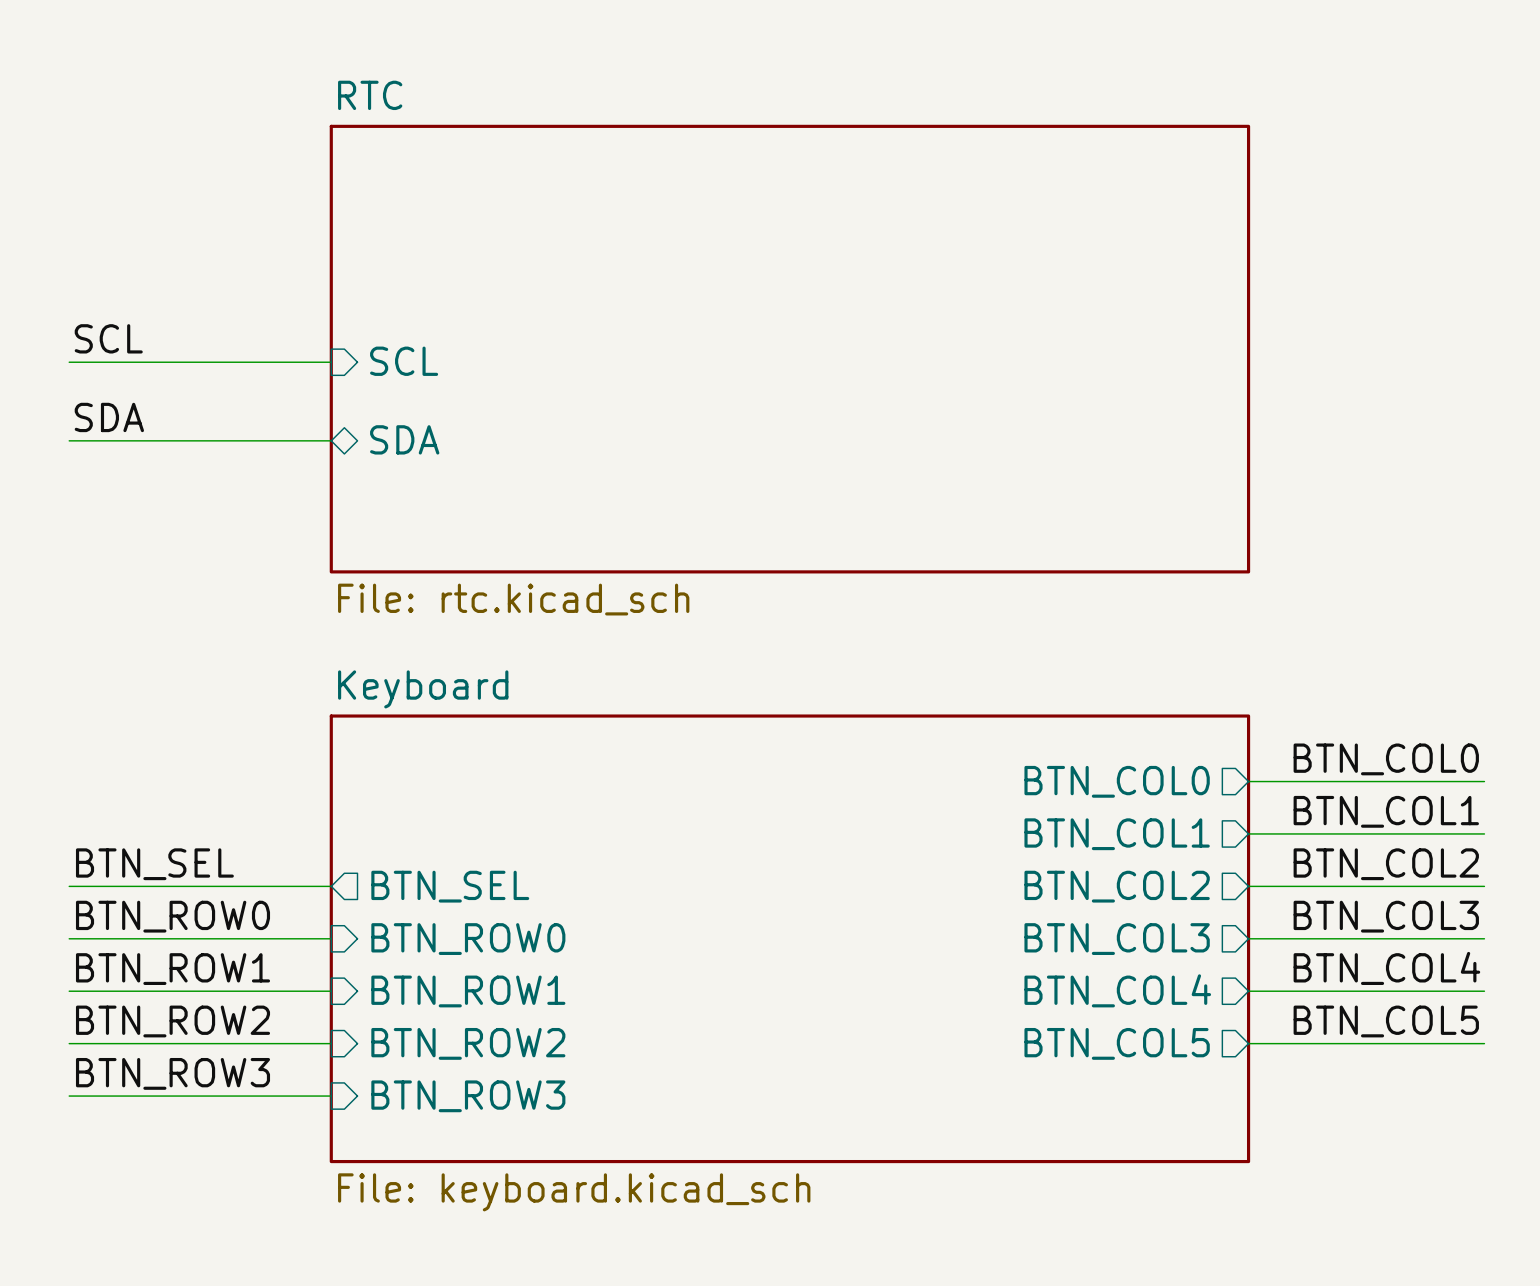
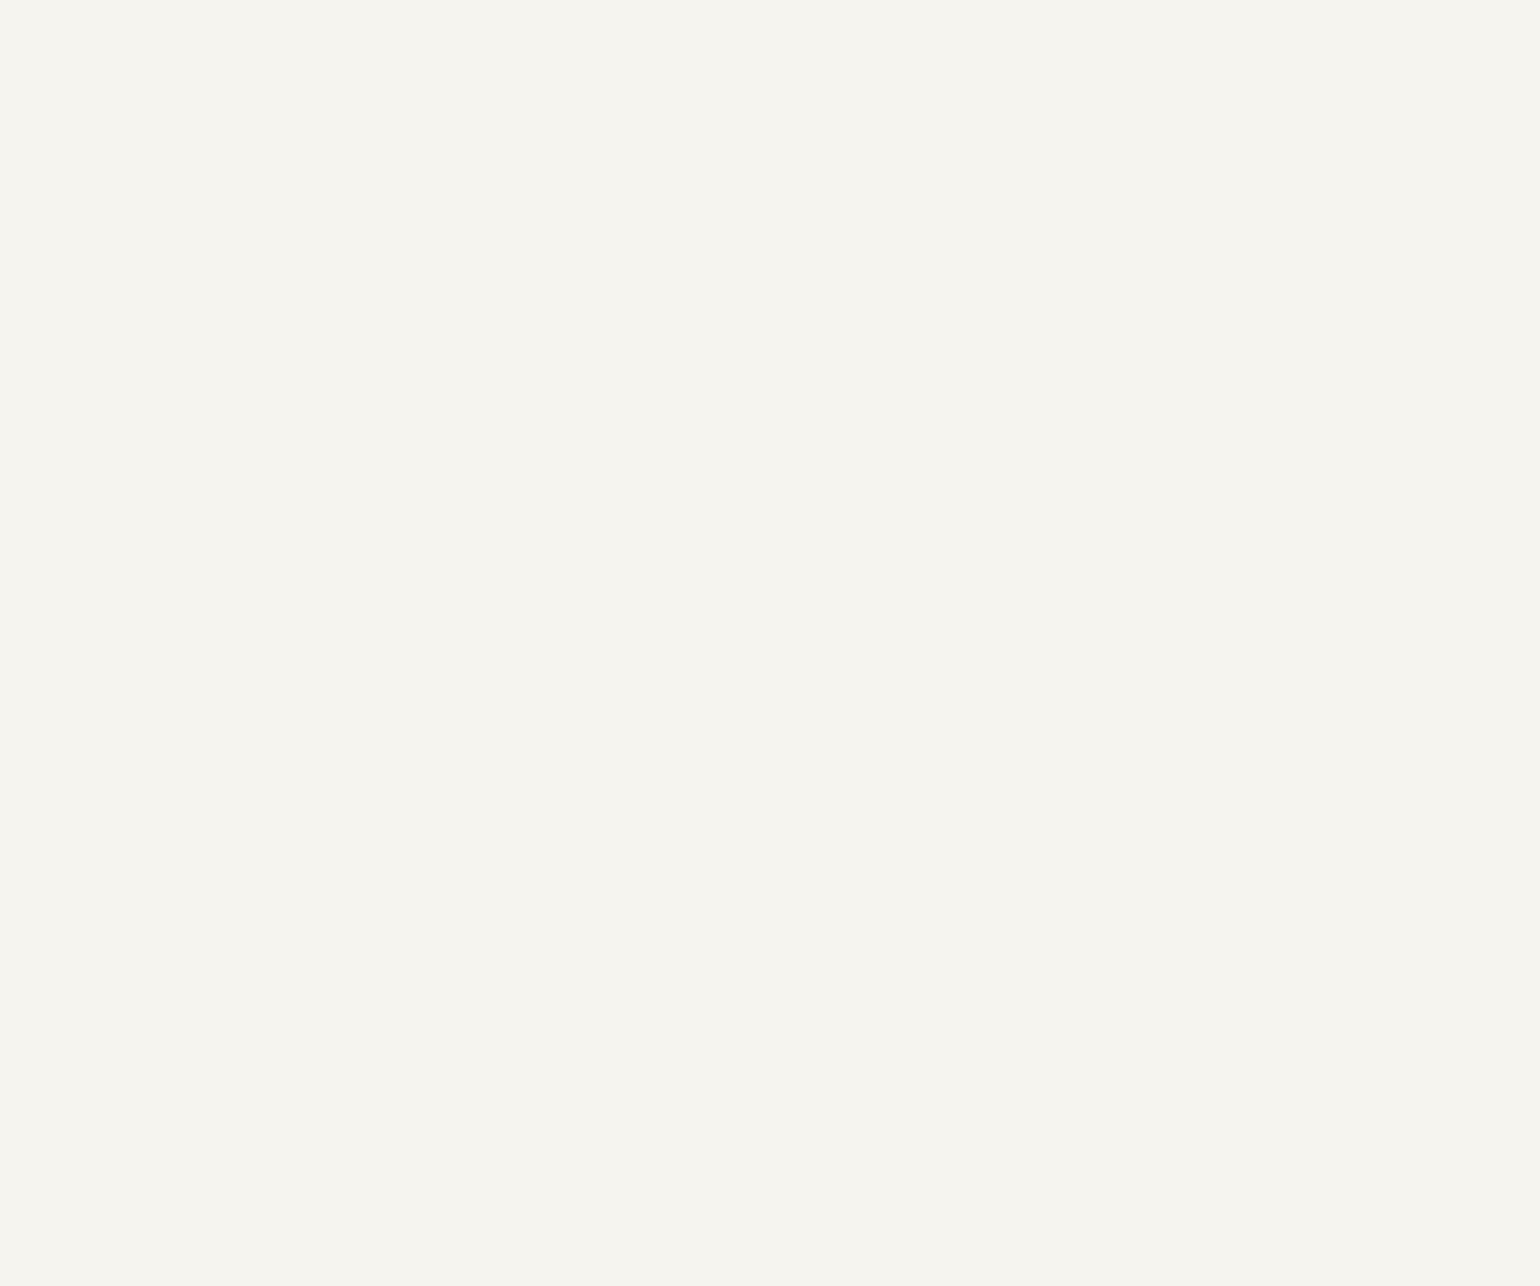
label: SCL (108, 338) -> none
sheet RTC: File: rtc.kicad_sch (789, 349) -> none
sheet pin: SCL (404, 361) -> none
wire: (69, 362) (331, 362) -> none
label: SDA (109, 417) -> none
sheet pin: SDA (404, 439) -> none
wire: (69, 440) (331, 440) -> none
label: BTN_COL0 (1386, 759) -> none
sheet pin: BTN_COL0 (1117, 781) -> none
wire: (1248, 781) (1484, 781) -> none
label: BTN_COL1 (1386, 811) -> none
wire: (1248, 833) (1484, 833) -> none
sheet pin: BTN_COL1 (1117, 834) -> none
label: BTN_SEL (154, 864) -> none
label: BTN_COL2 (1386, 864) -> none
wire: (69, 886) (331, 886) -> none
sheet pin: BTN_SEL (450, 886) -> none
sheet pin: BTN_COL2 (1117, 886) -> none
wire: (1248, 886) (1484, 886) -> none
label: BTN_ROW0 (173, 916) -> none
label: BTN_COL3 (1386, 916) -> none
wire: (69, 938) (331, 938) -> none
sheet Keyboard: File: keyboard.kicad_sch (789, 938) -> none
wire: (1248, 938) (1484, 938) -> none
sheet pin: BTN_ROW0 (468, 939) -> none
sheet pin: BTN_COL3 (1117, 939) -> none
label: BTN_COL4 (1386, 968) -> none
label: BTN_ROW1 (173, 969) -> none
sheet pin: BTN_COL4 (1117, 990) -> none
wire: (69, 991) (331, 991) -> none
sheet pin: BTN_ROW1 (468, 991) -> none
wire: (1248, 991) (1484, 991) -> none
label: BTN_ROW2 (173, 1021) -> none
label: BTN_COL5 (1386, 1021) -> none
wire: (69, 1043) (331, 1043) -> none
sheet pin: BTN_ROW2 (468, 1043) -> none
sheet pin: BTN_COL5 (1117, 1043) -> none
wire: (1248, 1043) (1484, 1043) -> none
label: BTN_ROW3 (173, 1073) -> none
wire: (69, 1096) (331, 1096) -> none
sheet pin: BTN_ROW3 (468, 1096) -> none

